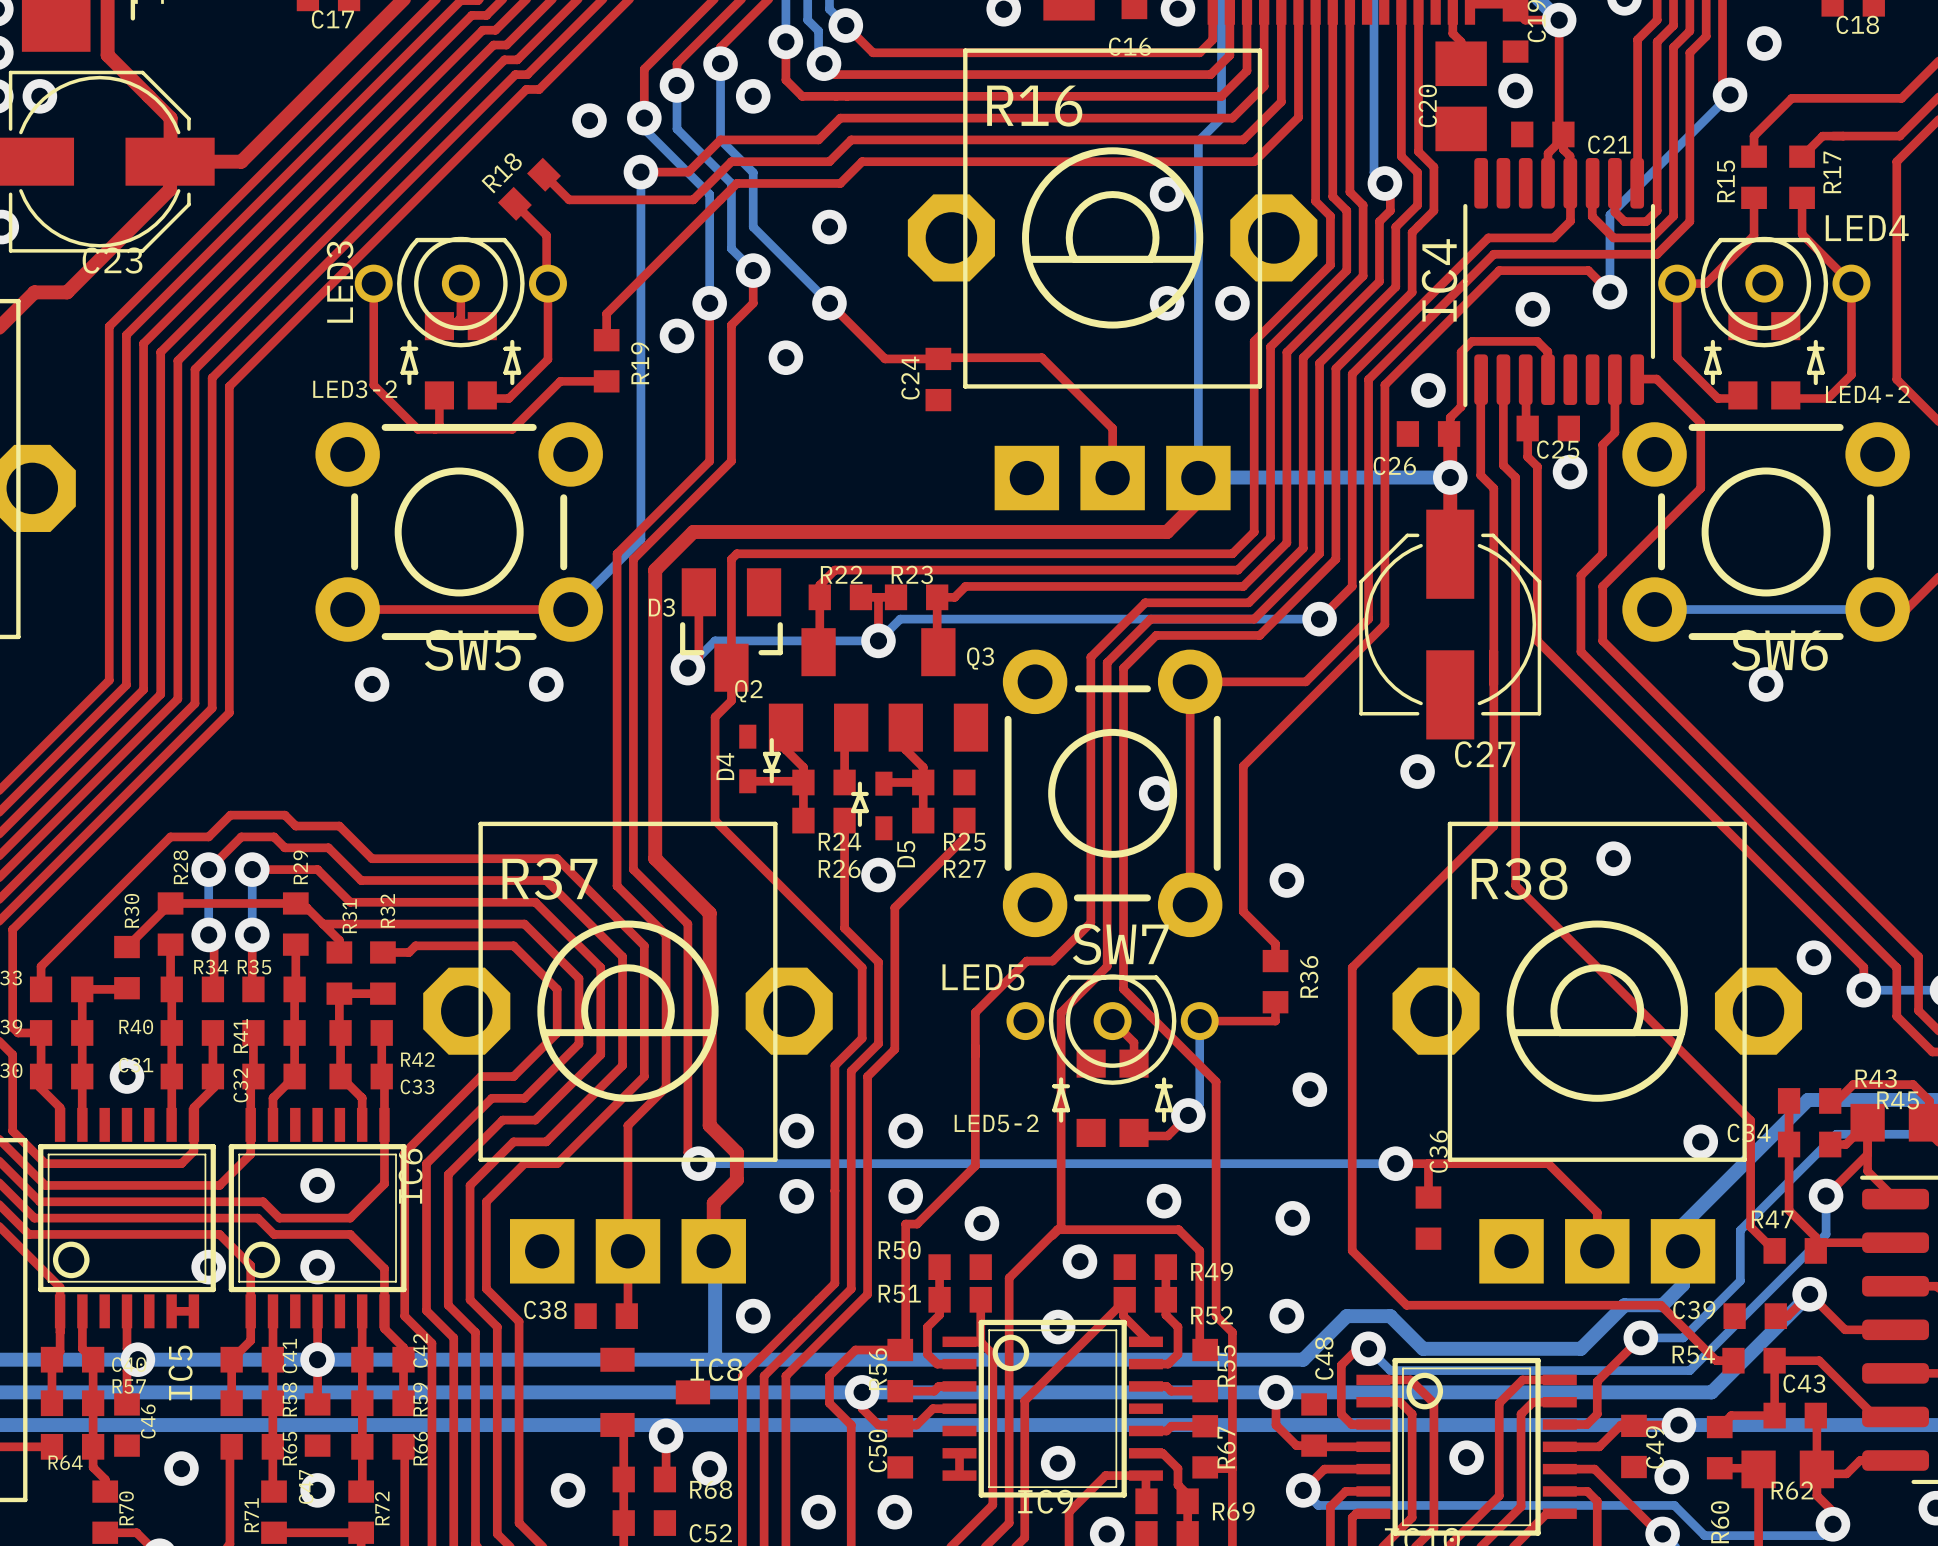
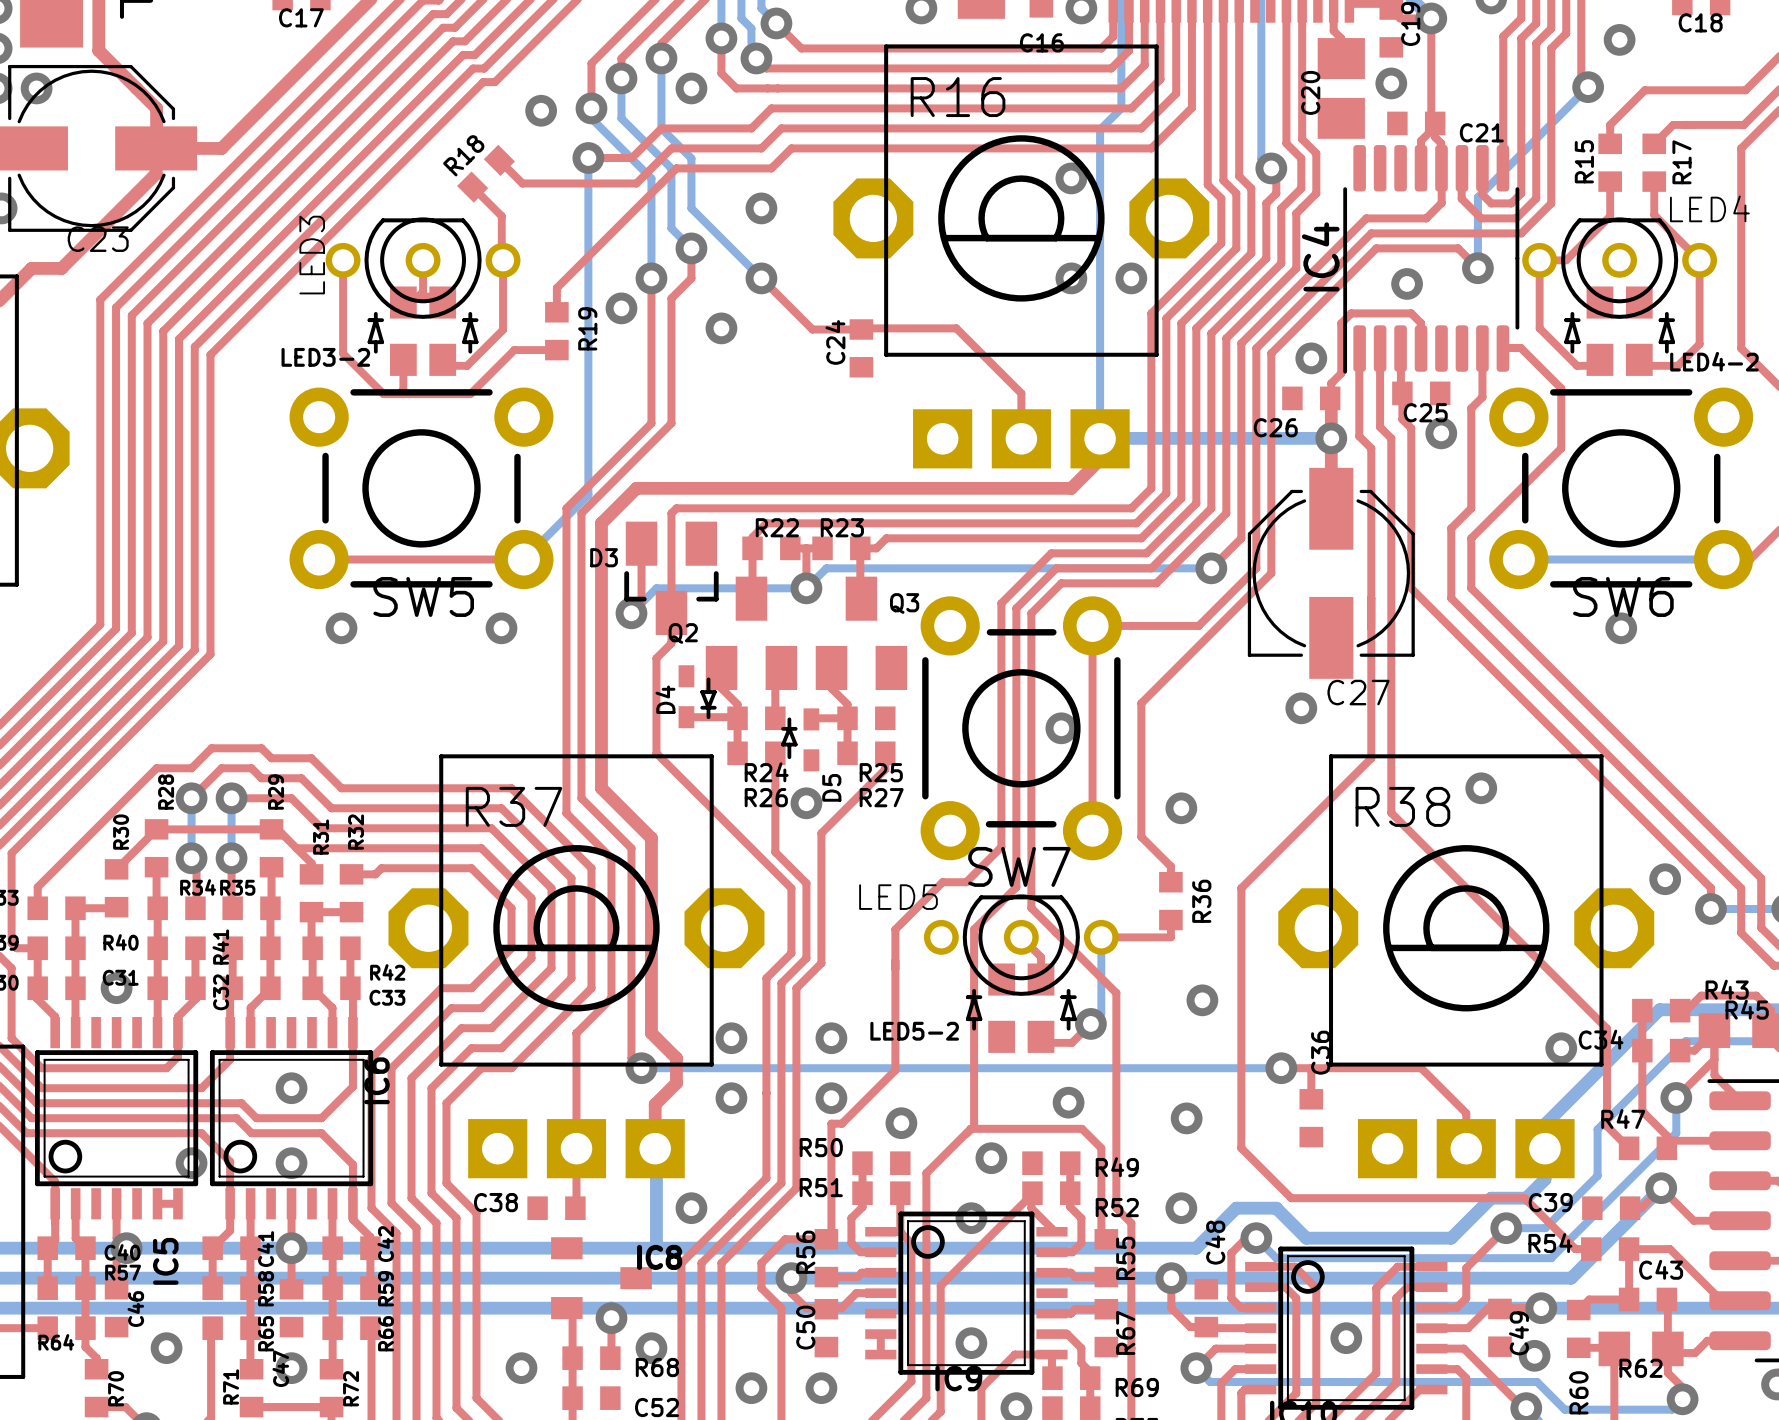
LED3-2 footprint: [400, 312, 522, 410] -> [367, 286, 479, 376]
LED4-2 footprint: [1703, 312, 1825, 410] -> [1564, 286, 1676, 376]
LED5-2 footprint: [1052, 1049, 1173, 1147] -> [965, 963, 1077, 1053]

